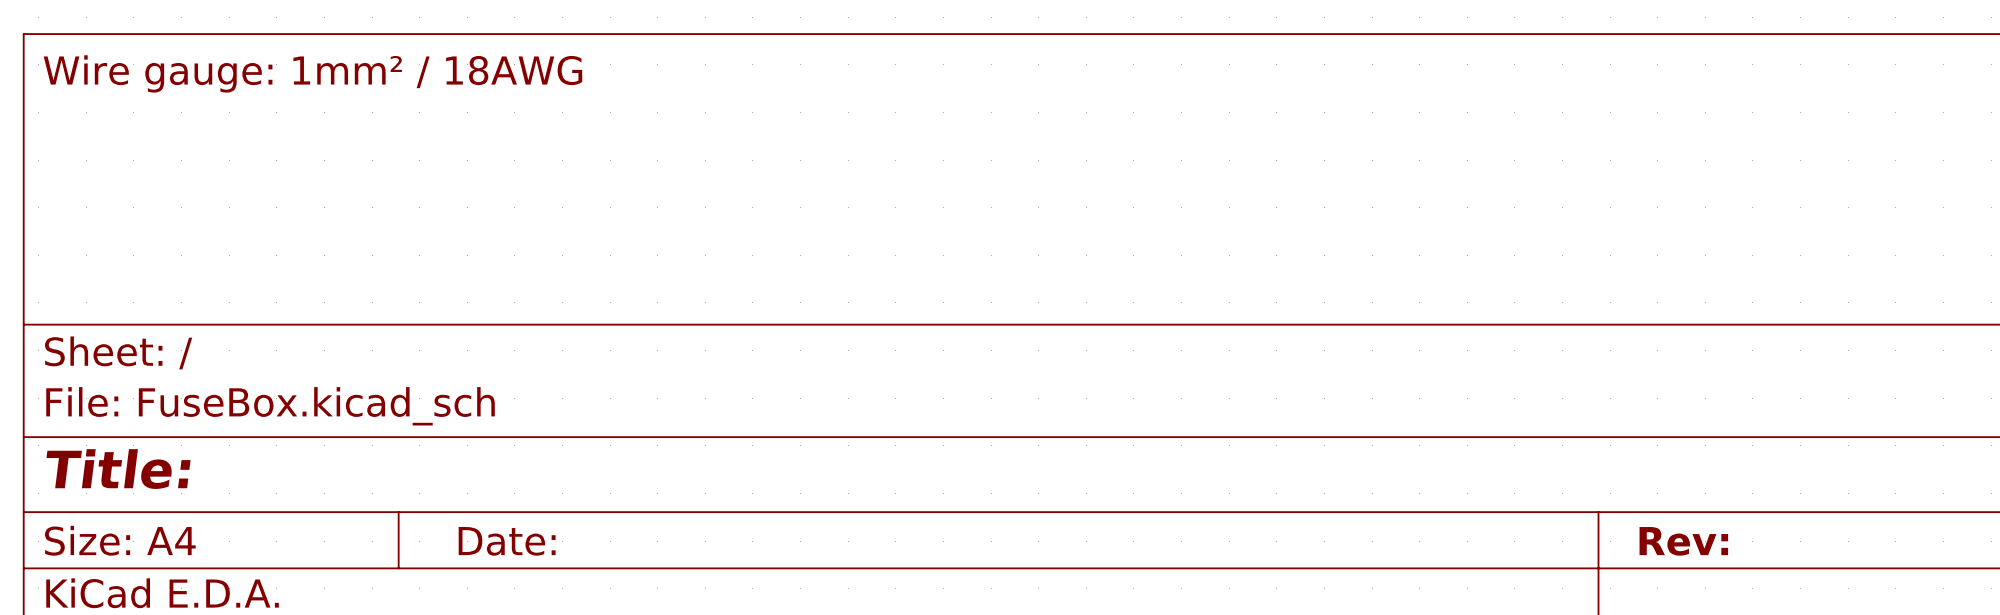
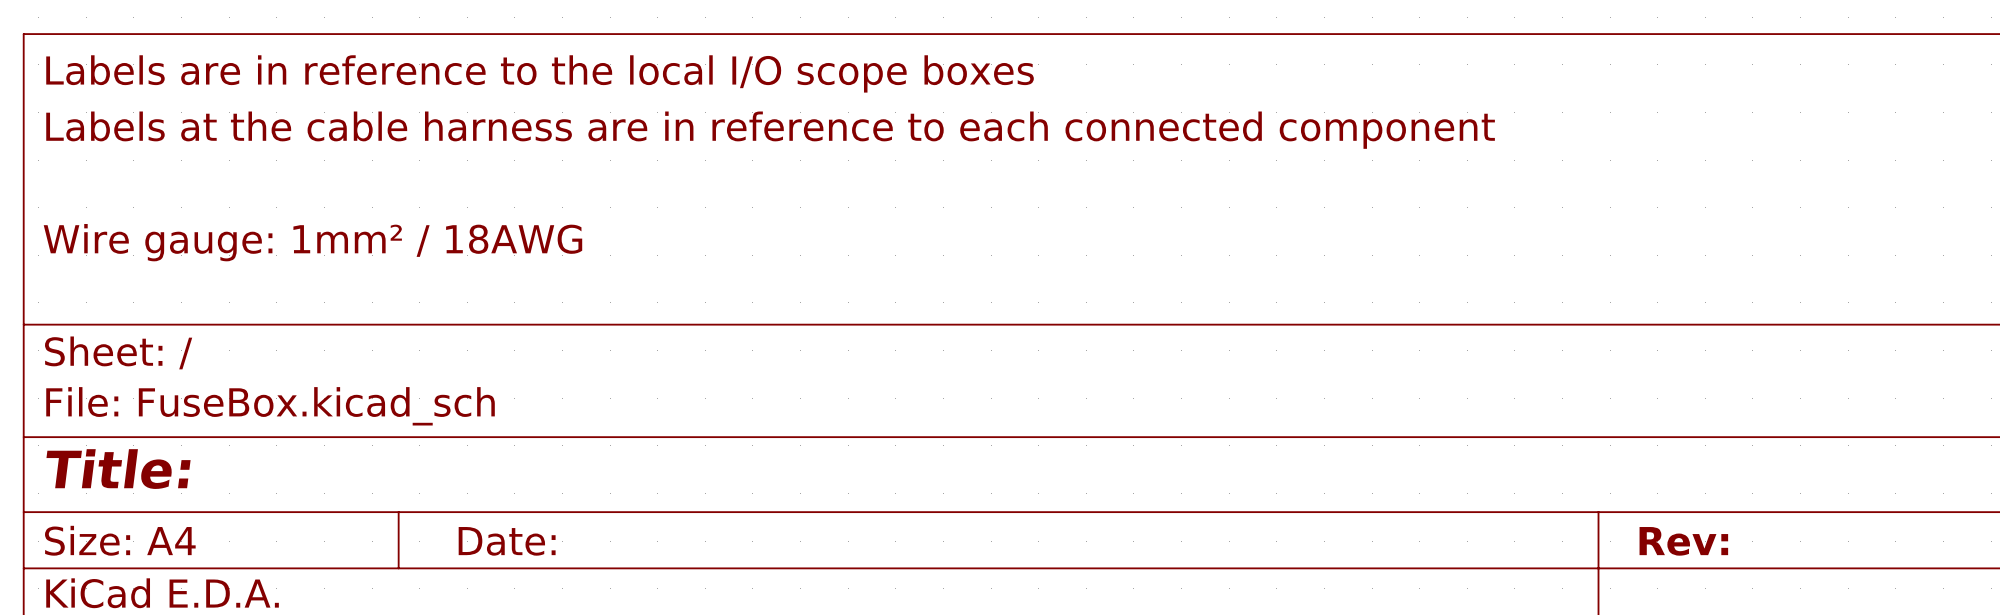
title block: Wire gauge: 1mm² / 18AWG (312, 73) -> Labels are in reference to the local I/O scope boxes (540, 73)
title block: none -> Labels at the cable harness are in reference to each connected component (770, 130)
title block: none -> Wire gauge: 1mm² / 18AWG (312, 242)

